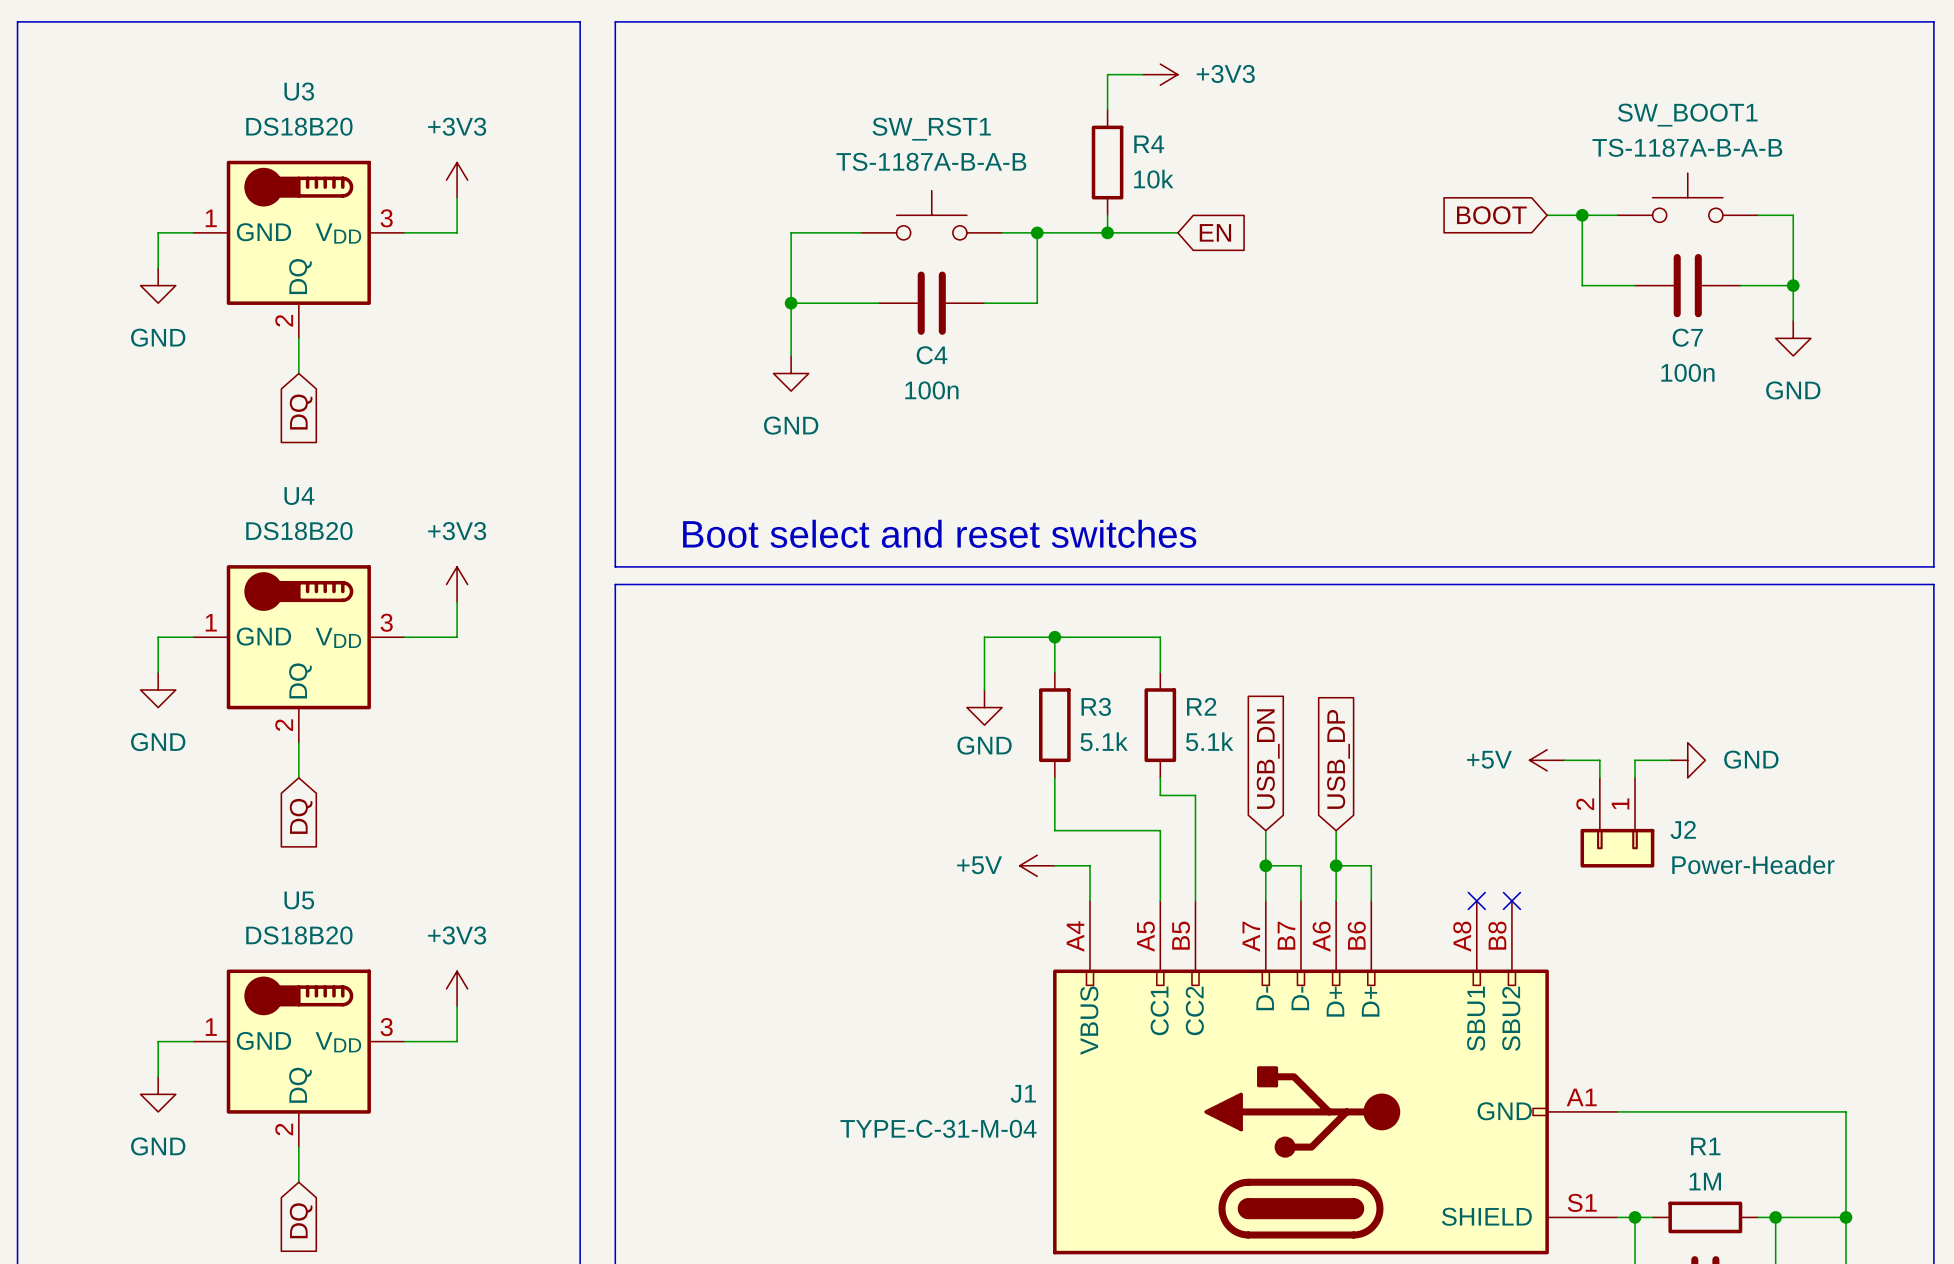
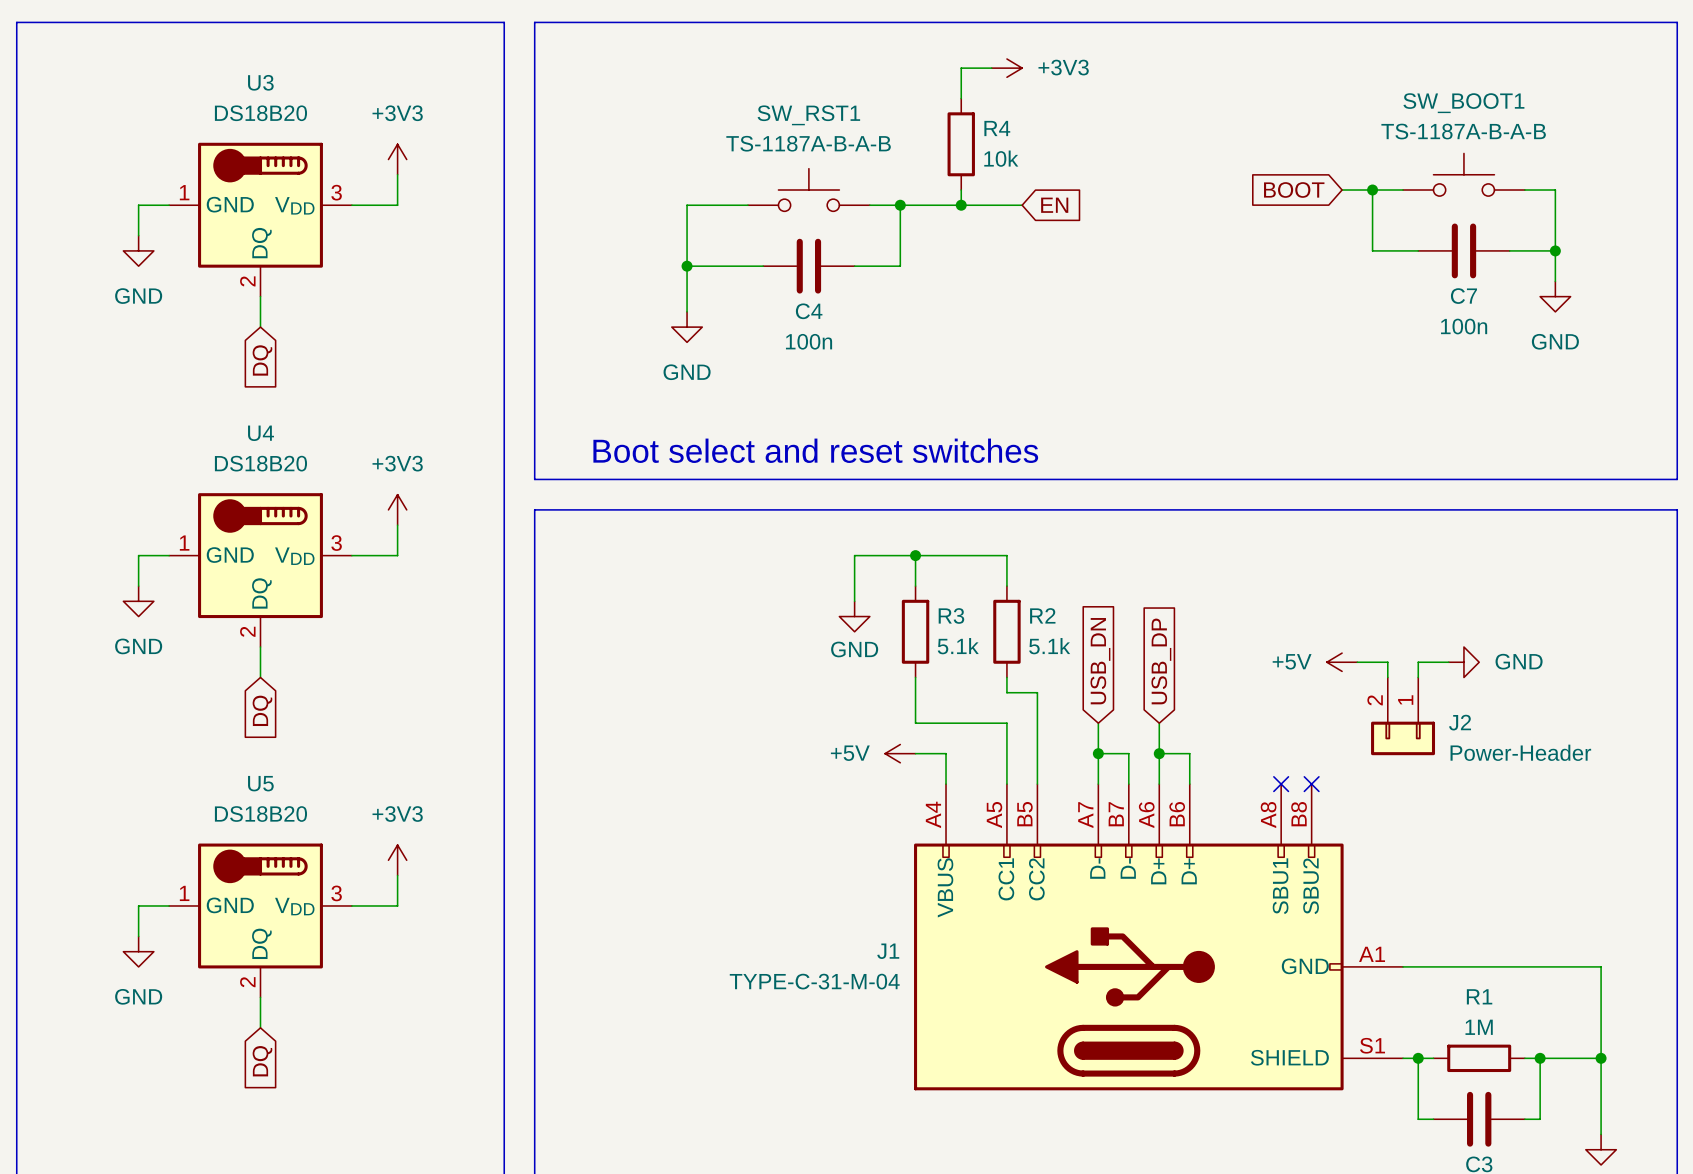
text position: Boot select and reset switches (939, 533) -> Boot select and reset switches (815, 450)
line: (615, 549) (615, 566) (1933, 566) (1933, 549) -> (534, 479) (1677, 479)

